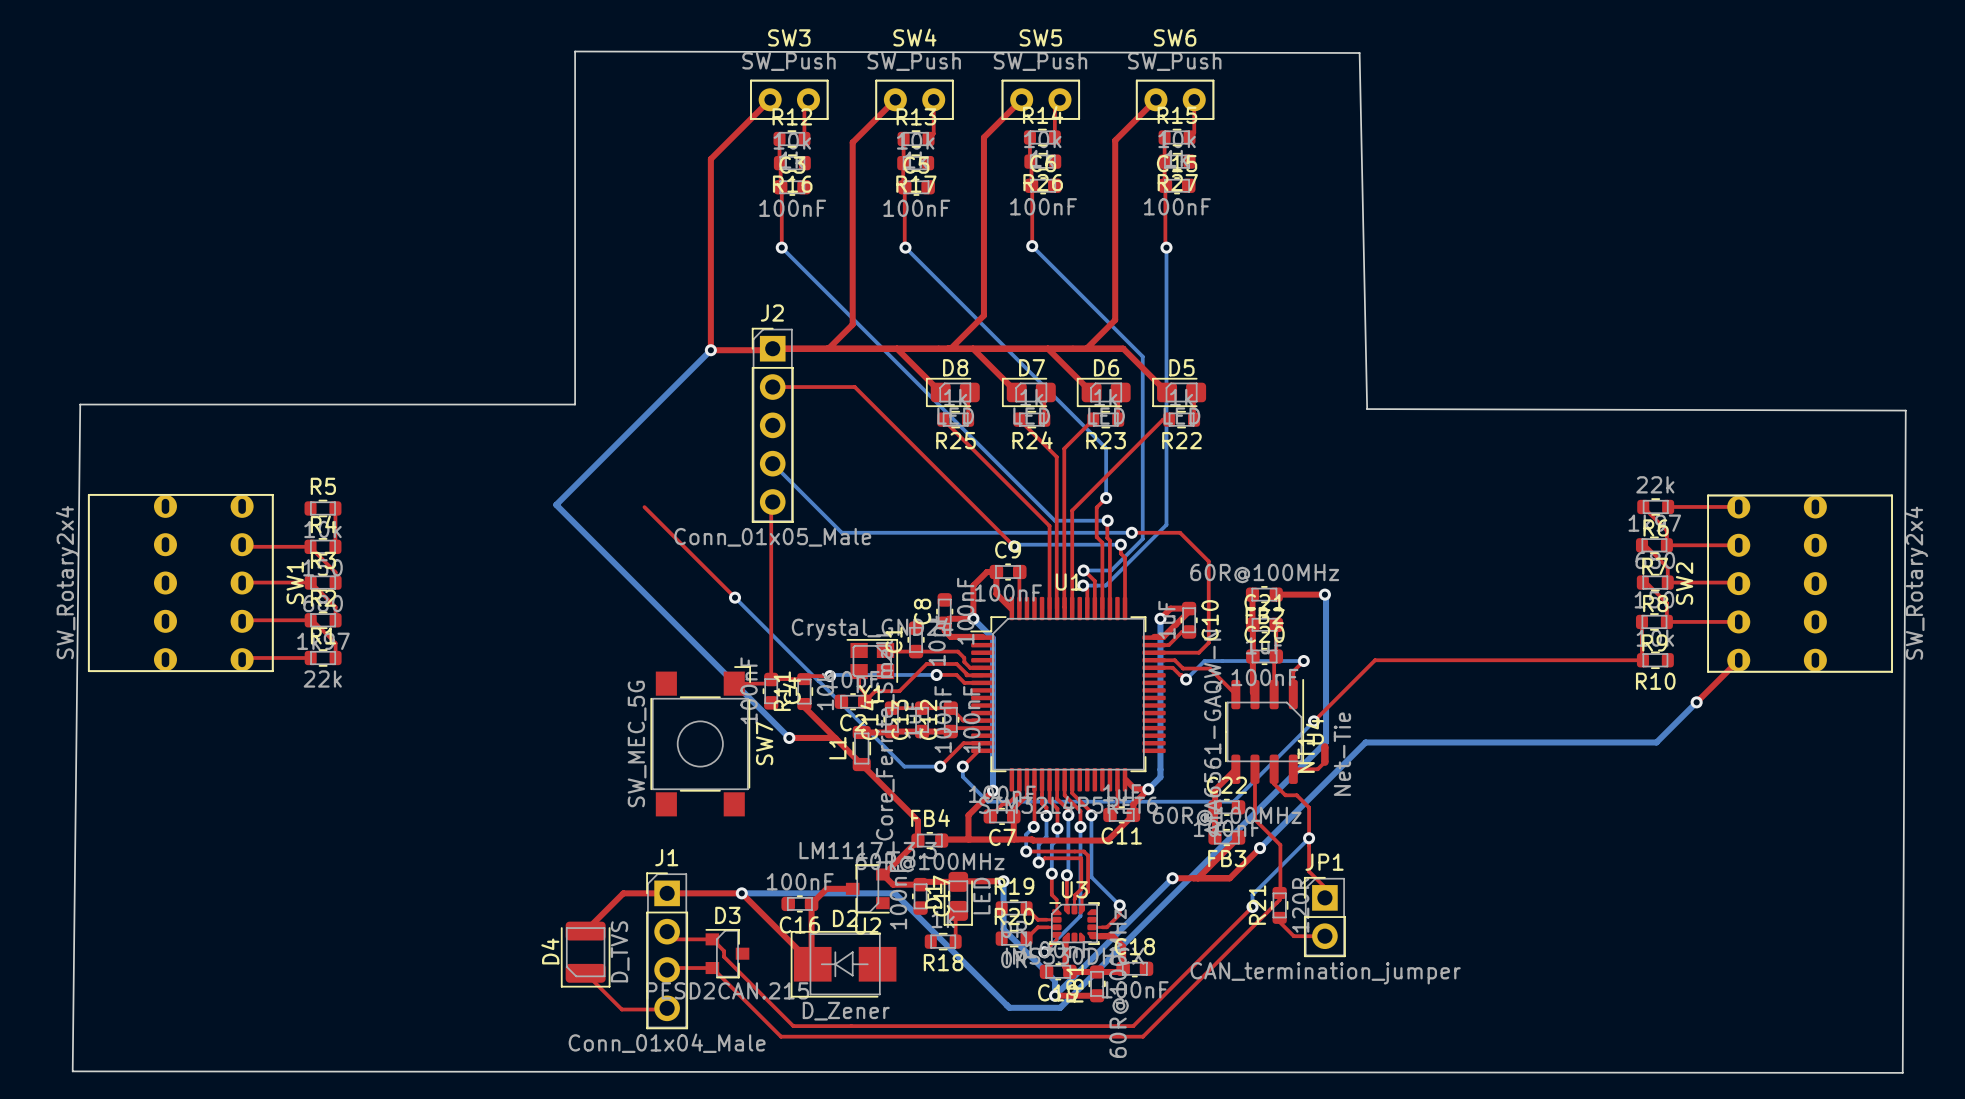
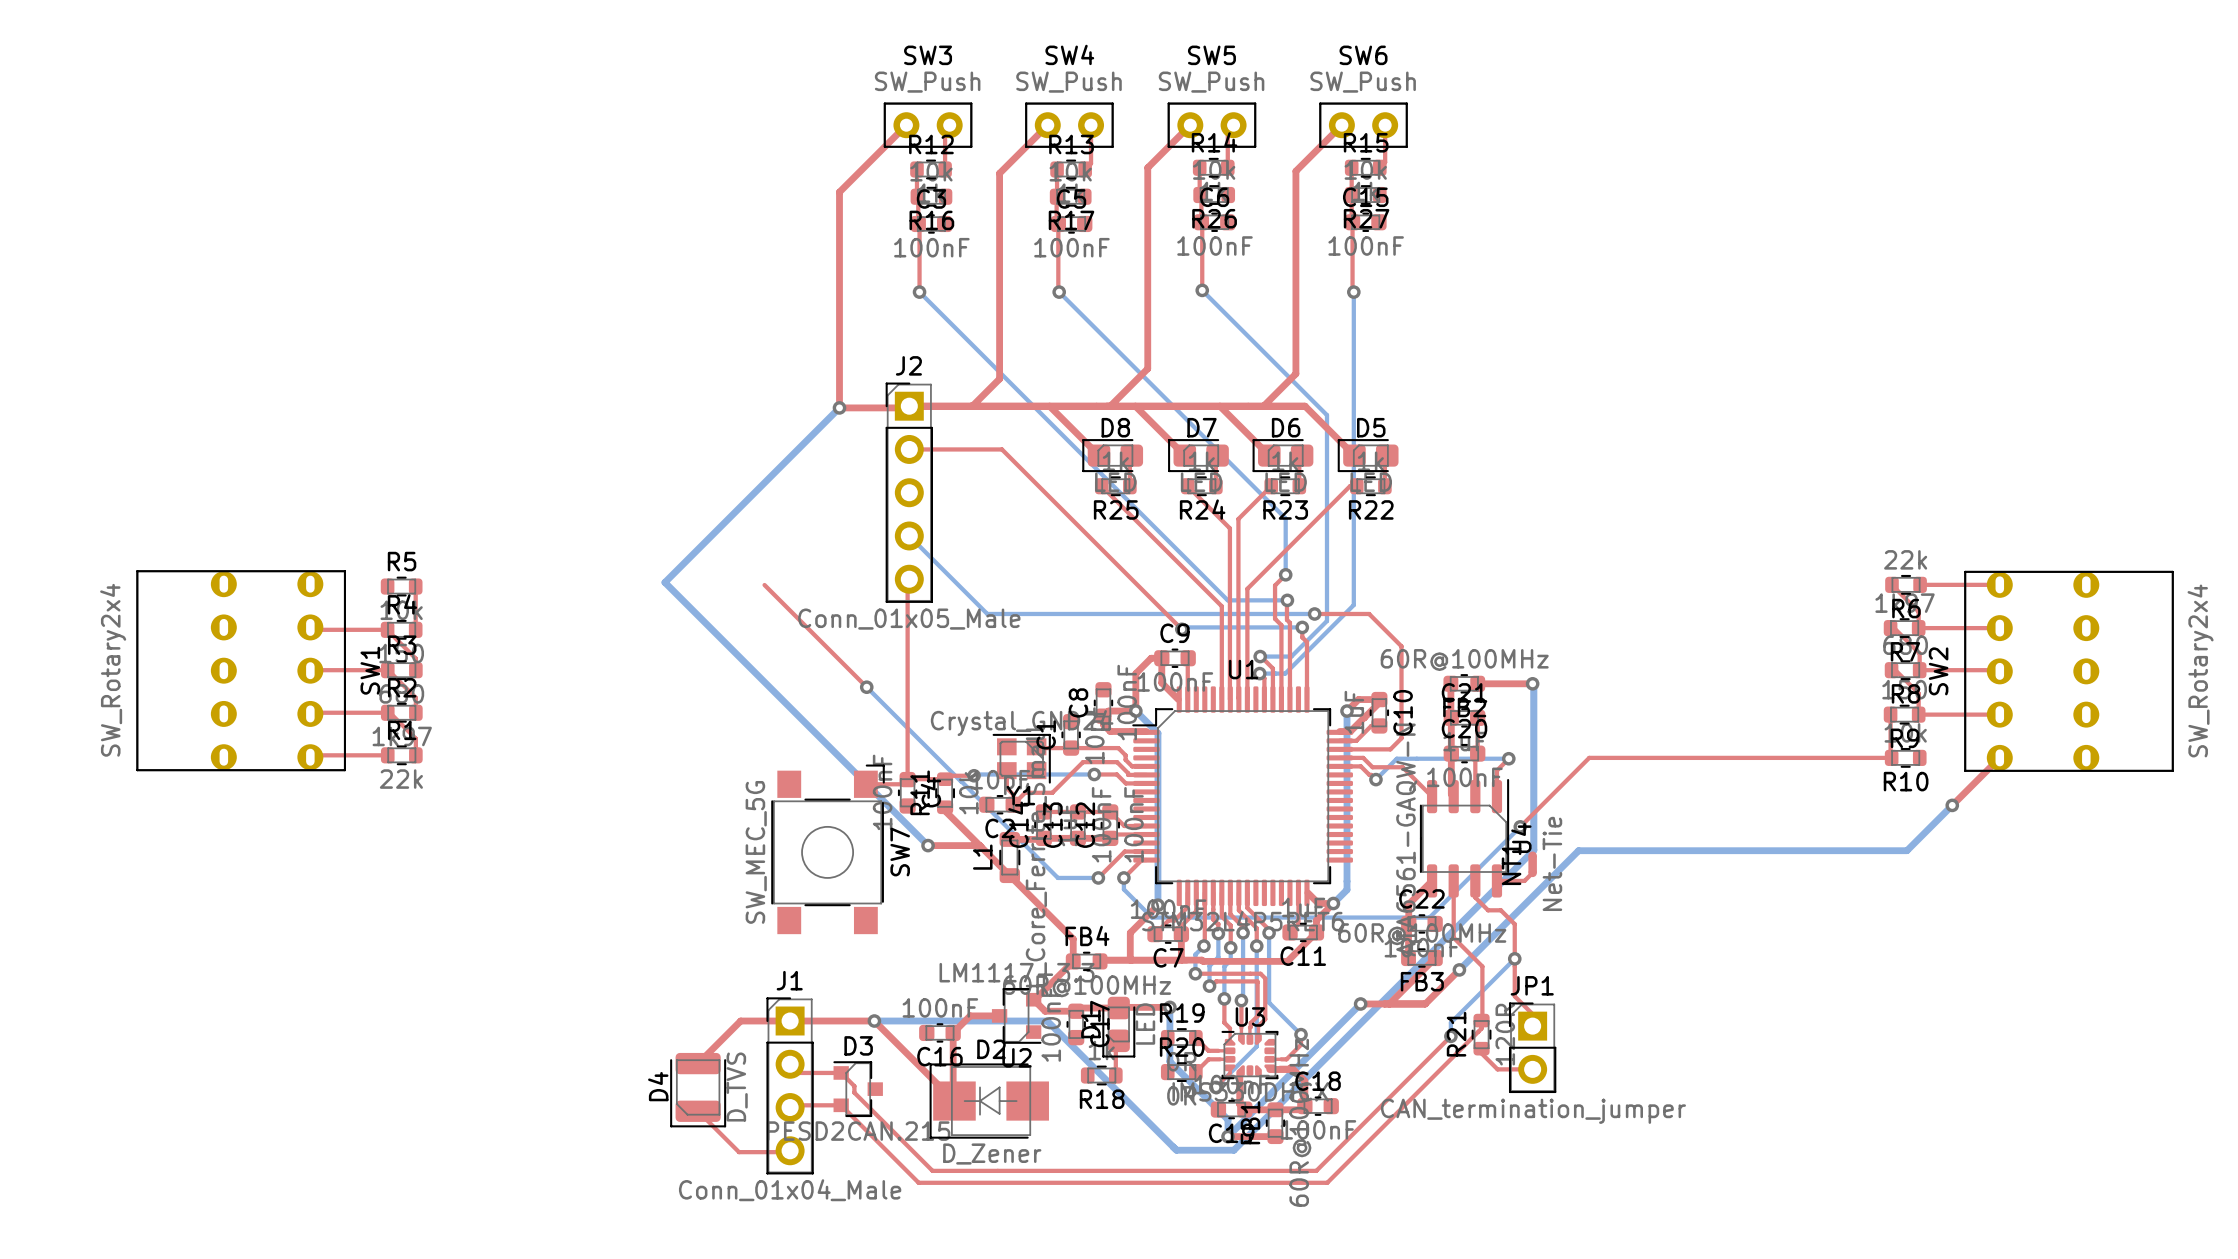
board edge: (575, 51) (1359, 53) (1367, 409) (1905, 410) (1902, 1072) (72, 1071) (80, 404) (575, 404) (575, 51) -> none

